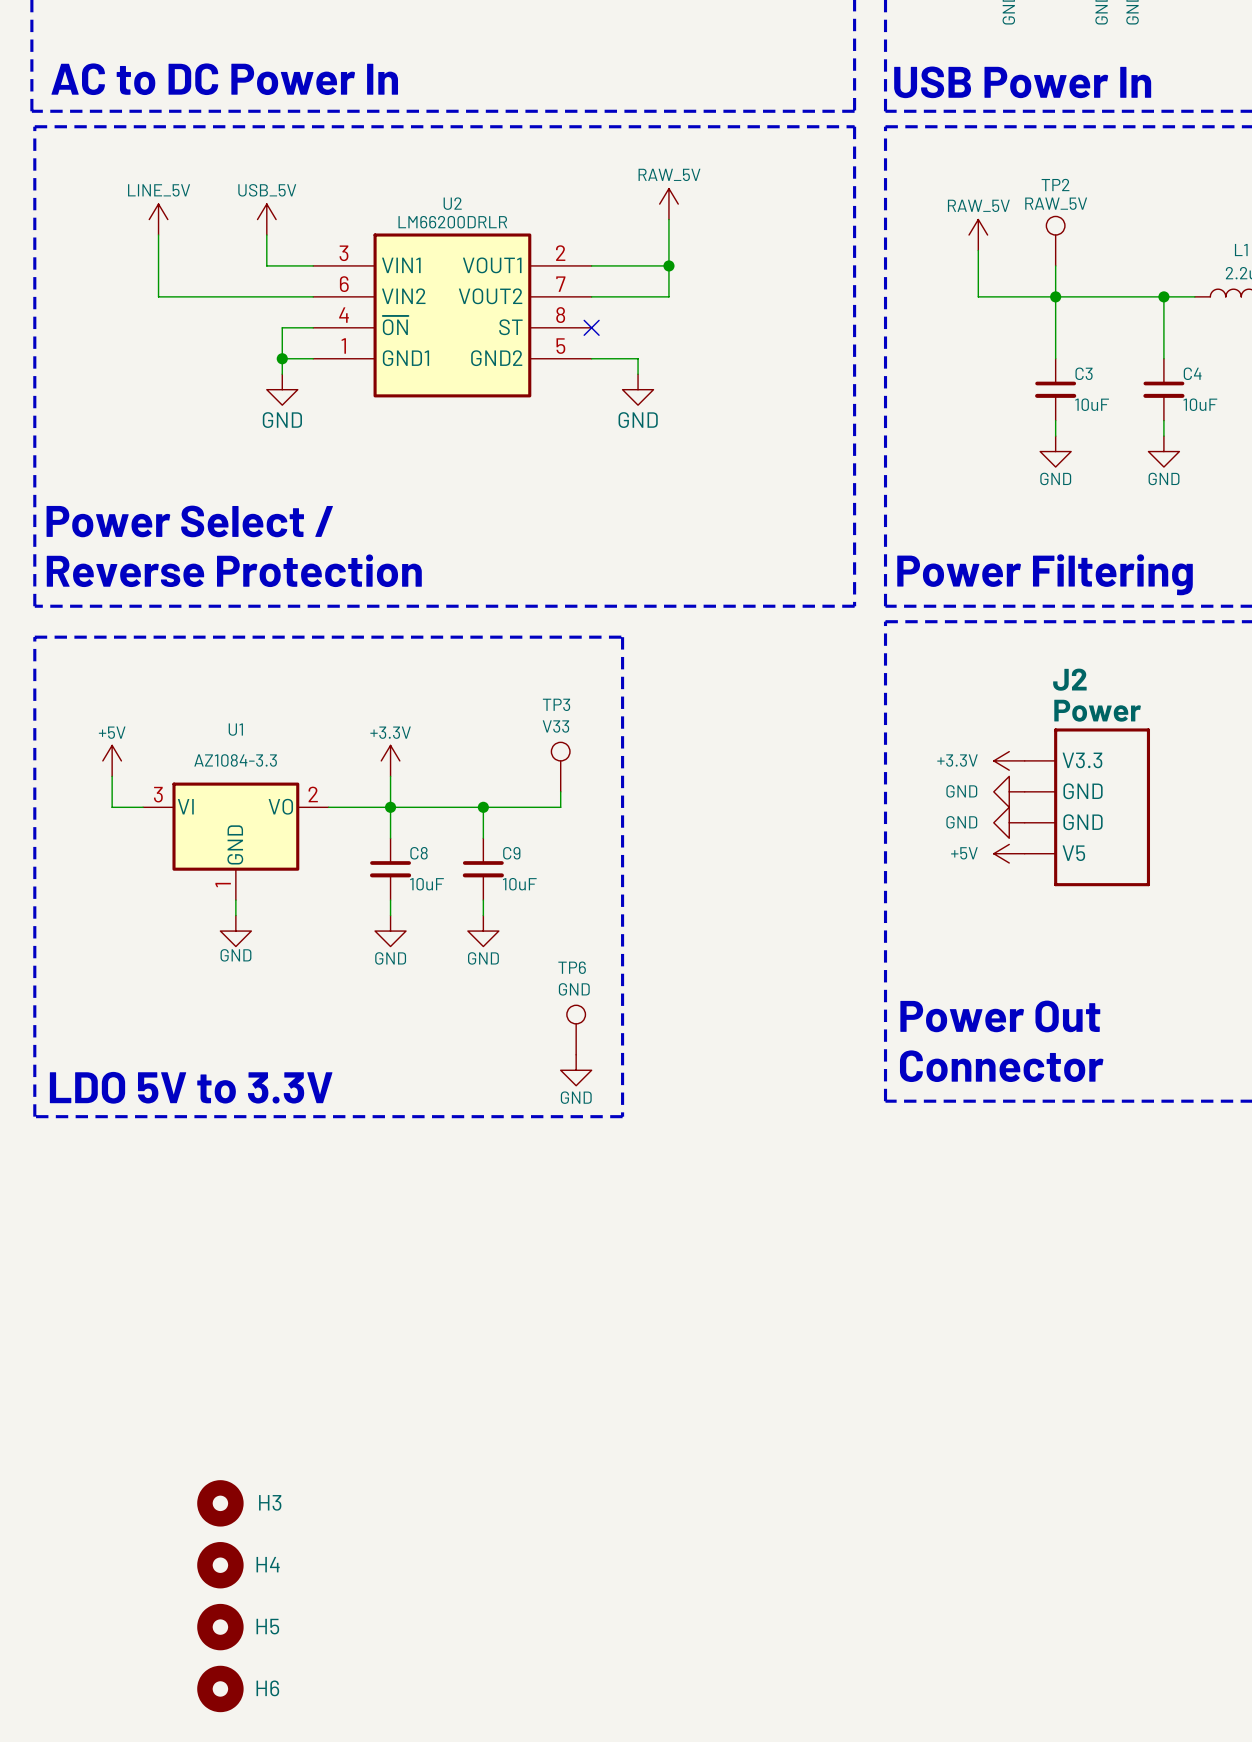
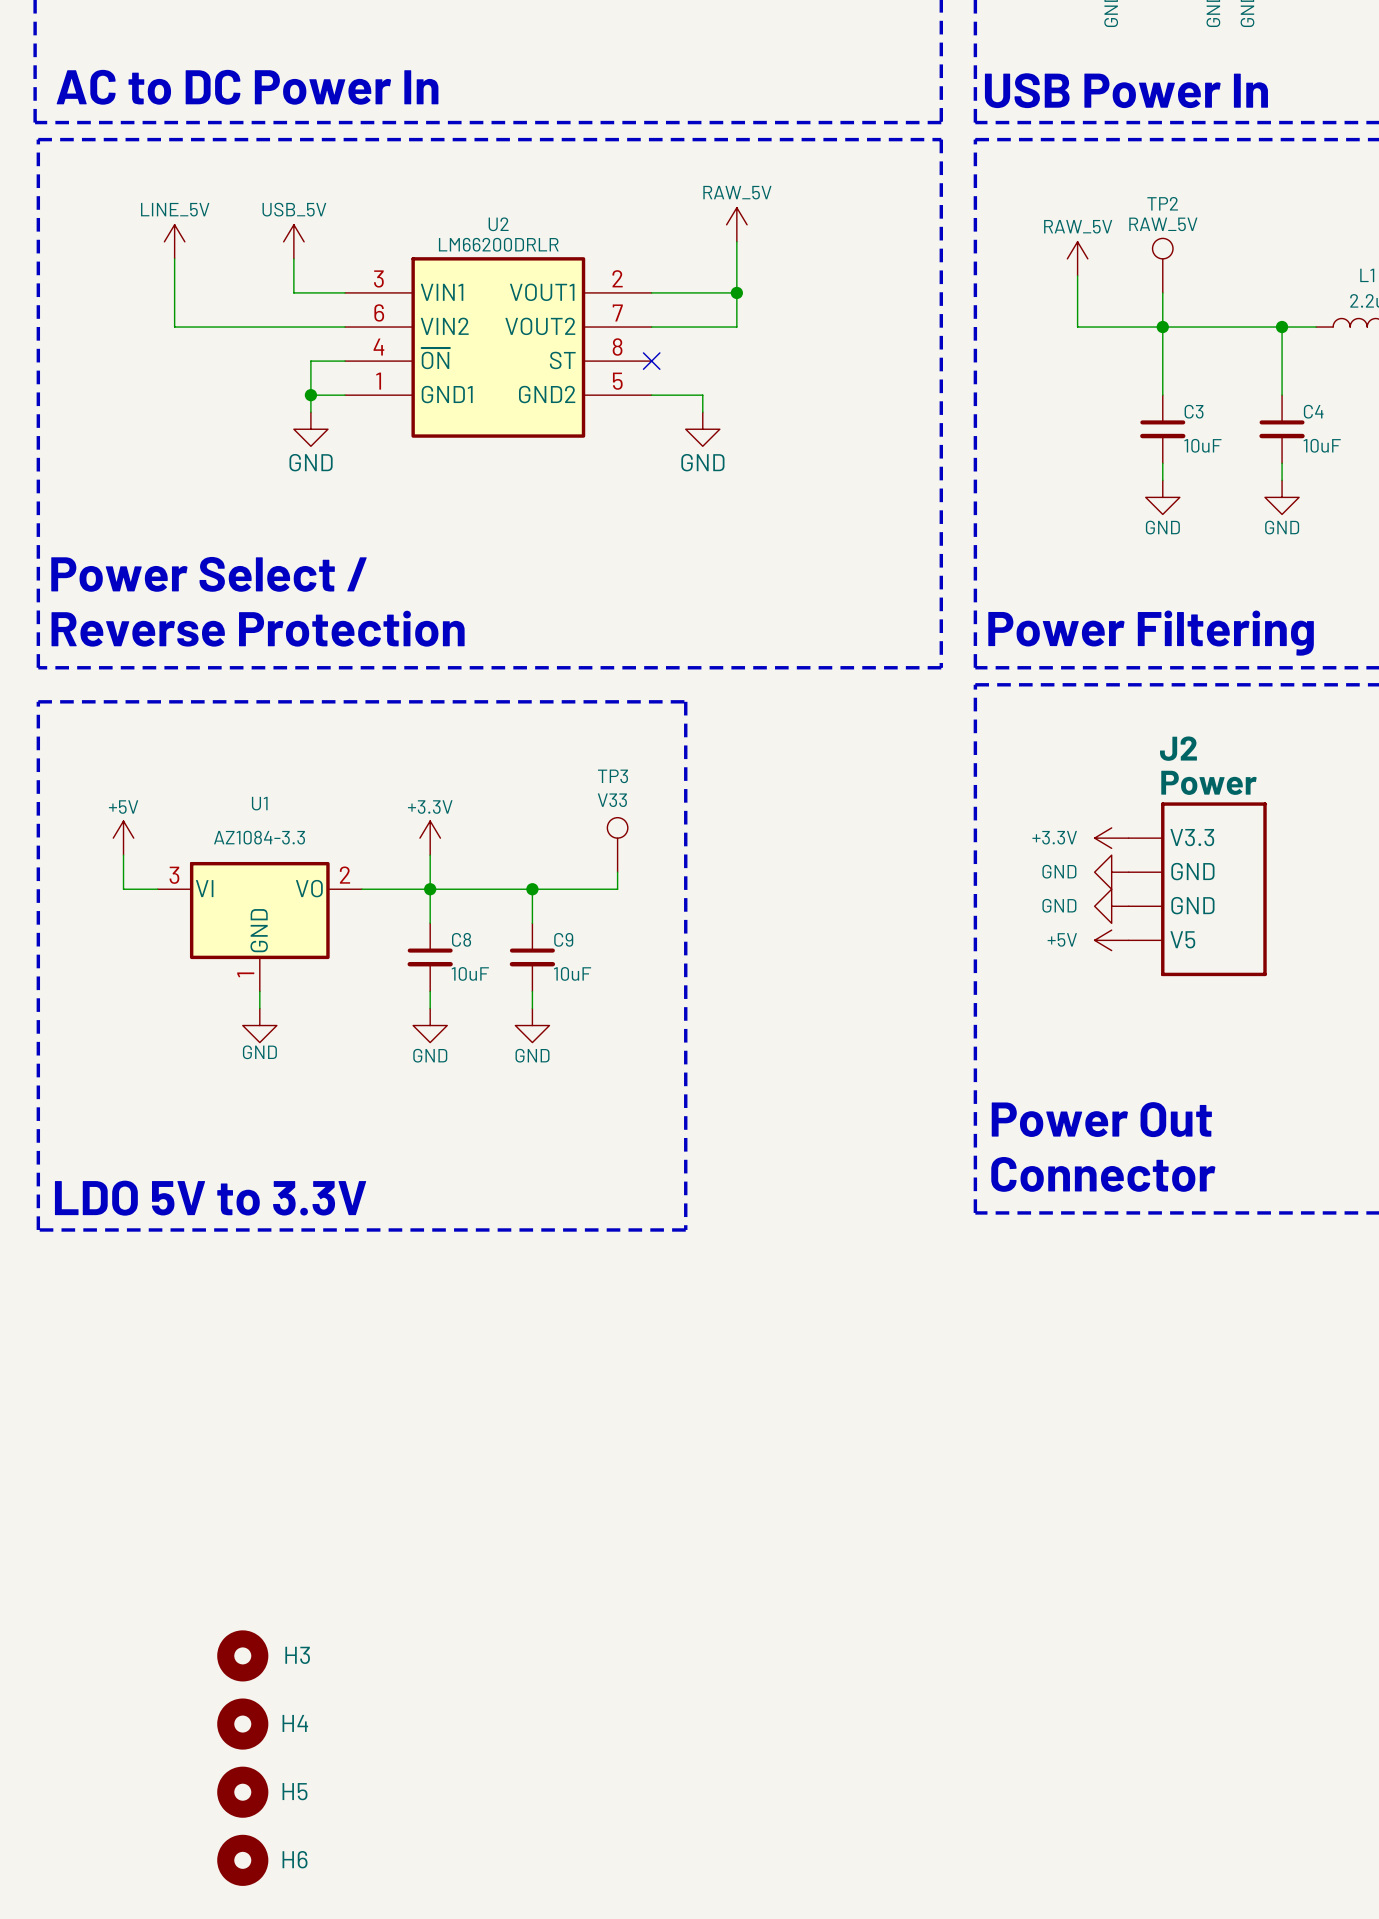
TP6: GND (576, 1030) -> none
power symbol: GND (576, 1070) -> none

